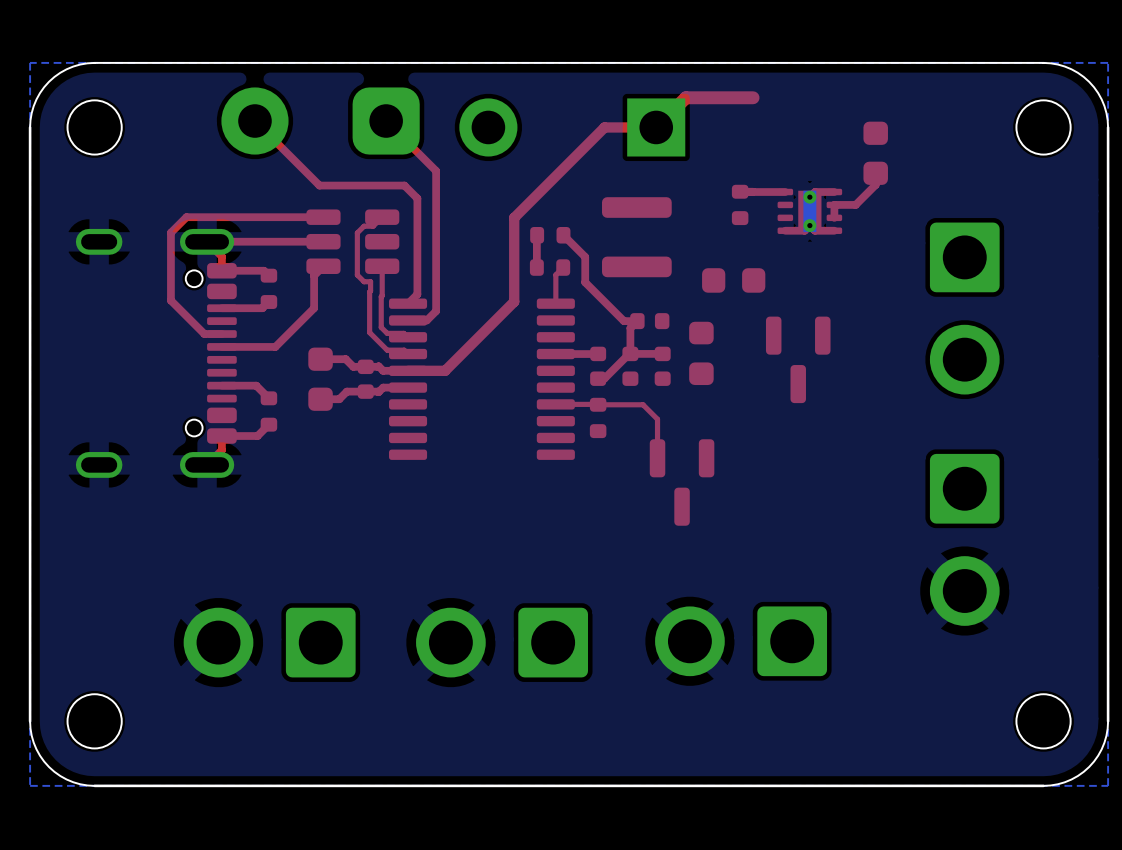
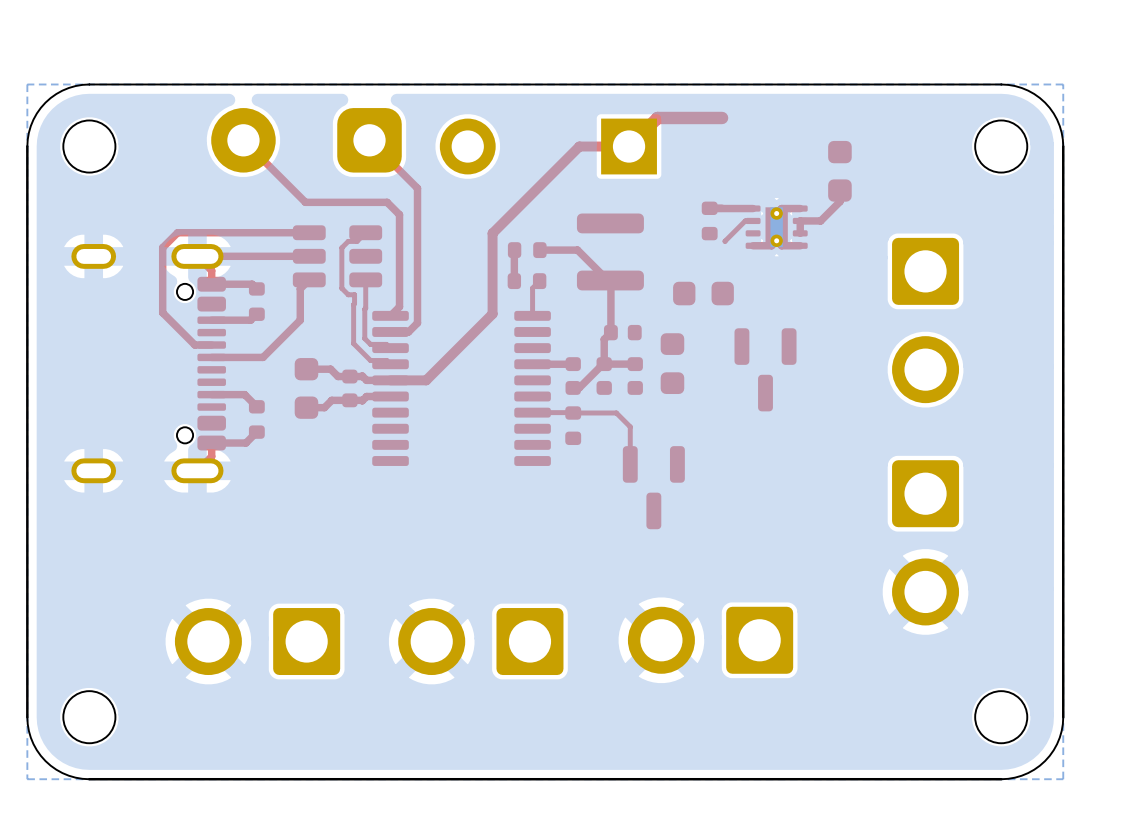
top track: none -> (753, 220) (745, 220) (725, 241)
top track: (563, 235) (585, 257) (585, 282) (623, 321) (637, 321) -> (539, 250) (577, 250) (610, 283) (610, 332)

